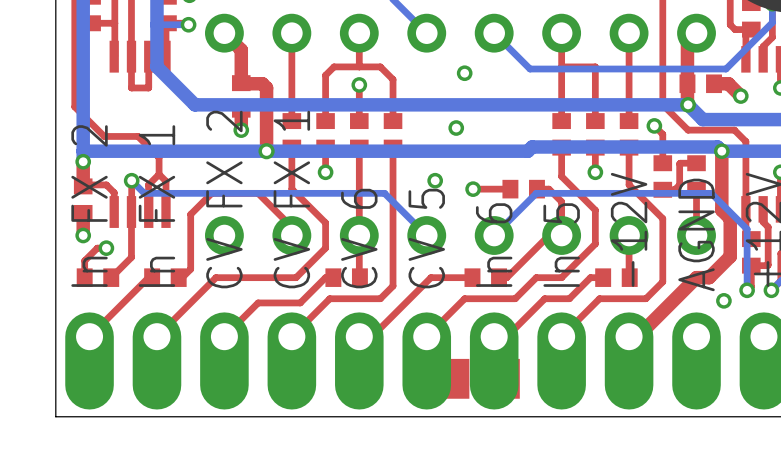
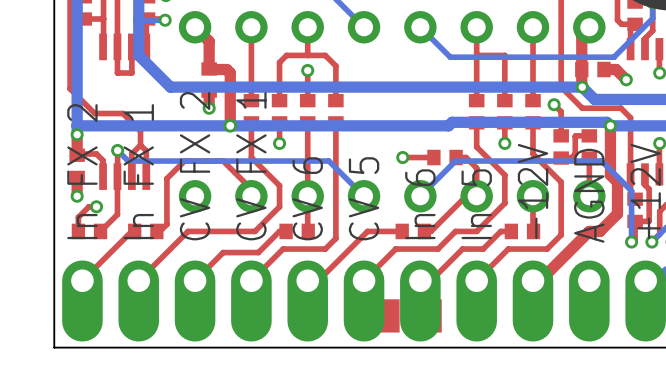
via: (464, 73) -> none
via: (456, 128) -> none
via: (435, 180) -> none
via: (723, 300) -> none

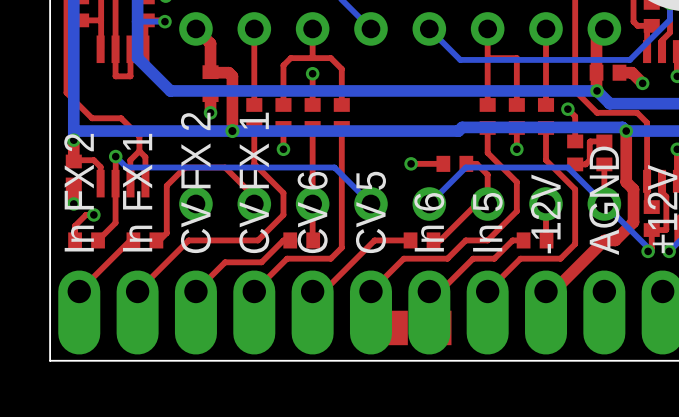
bottom track: (554, 161) (601, 161) (631, 190) (631, 242) -> (567, 167) (651, 251)

